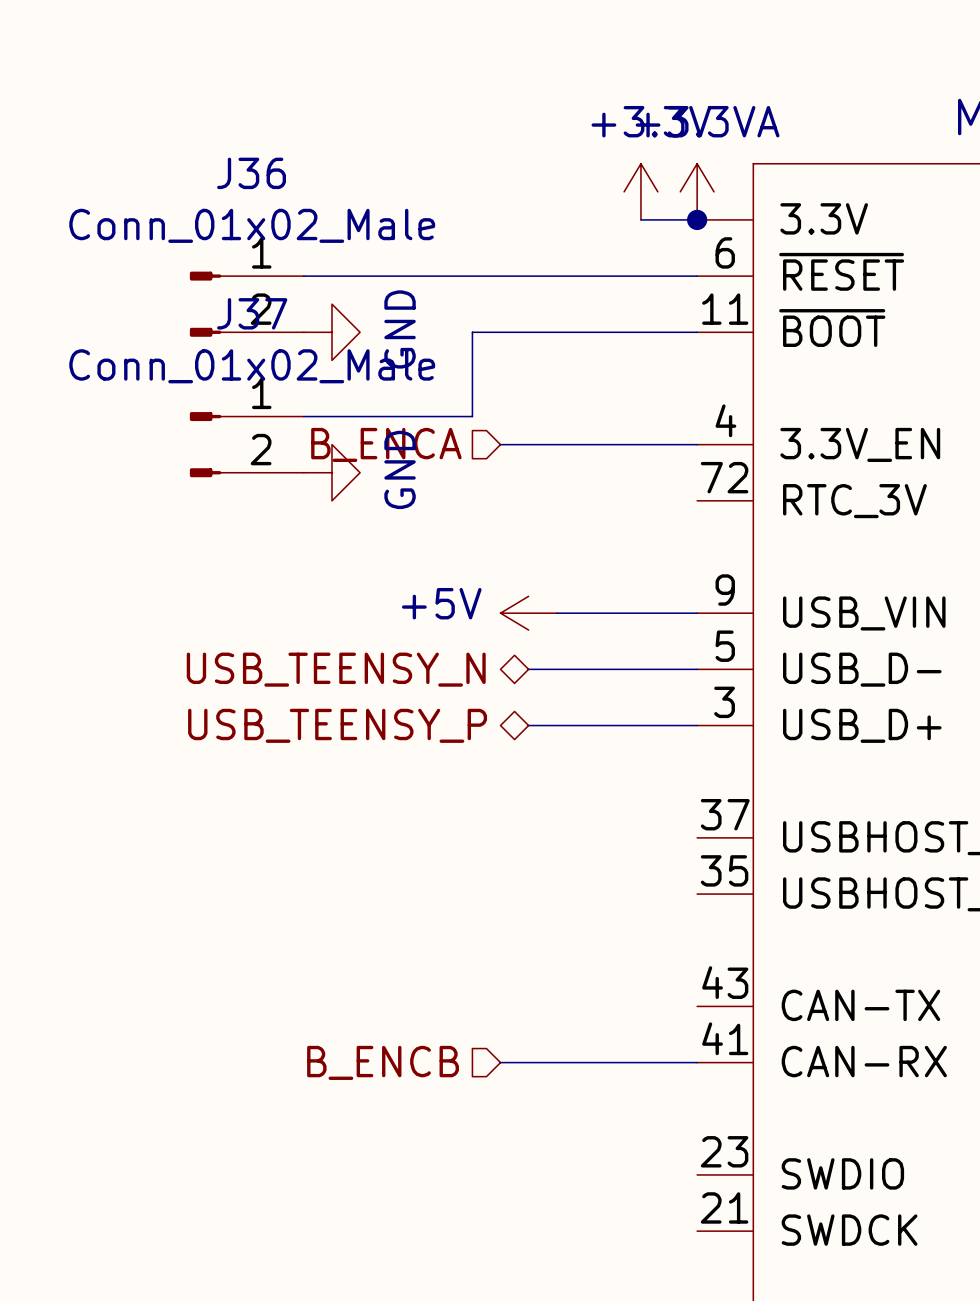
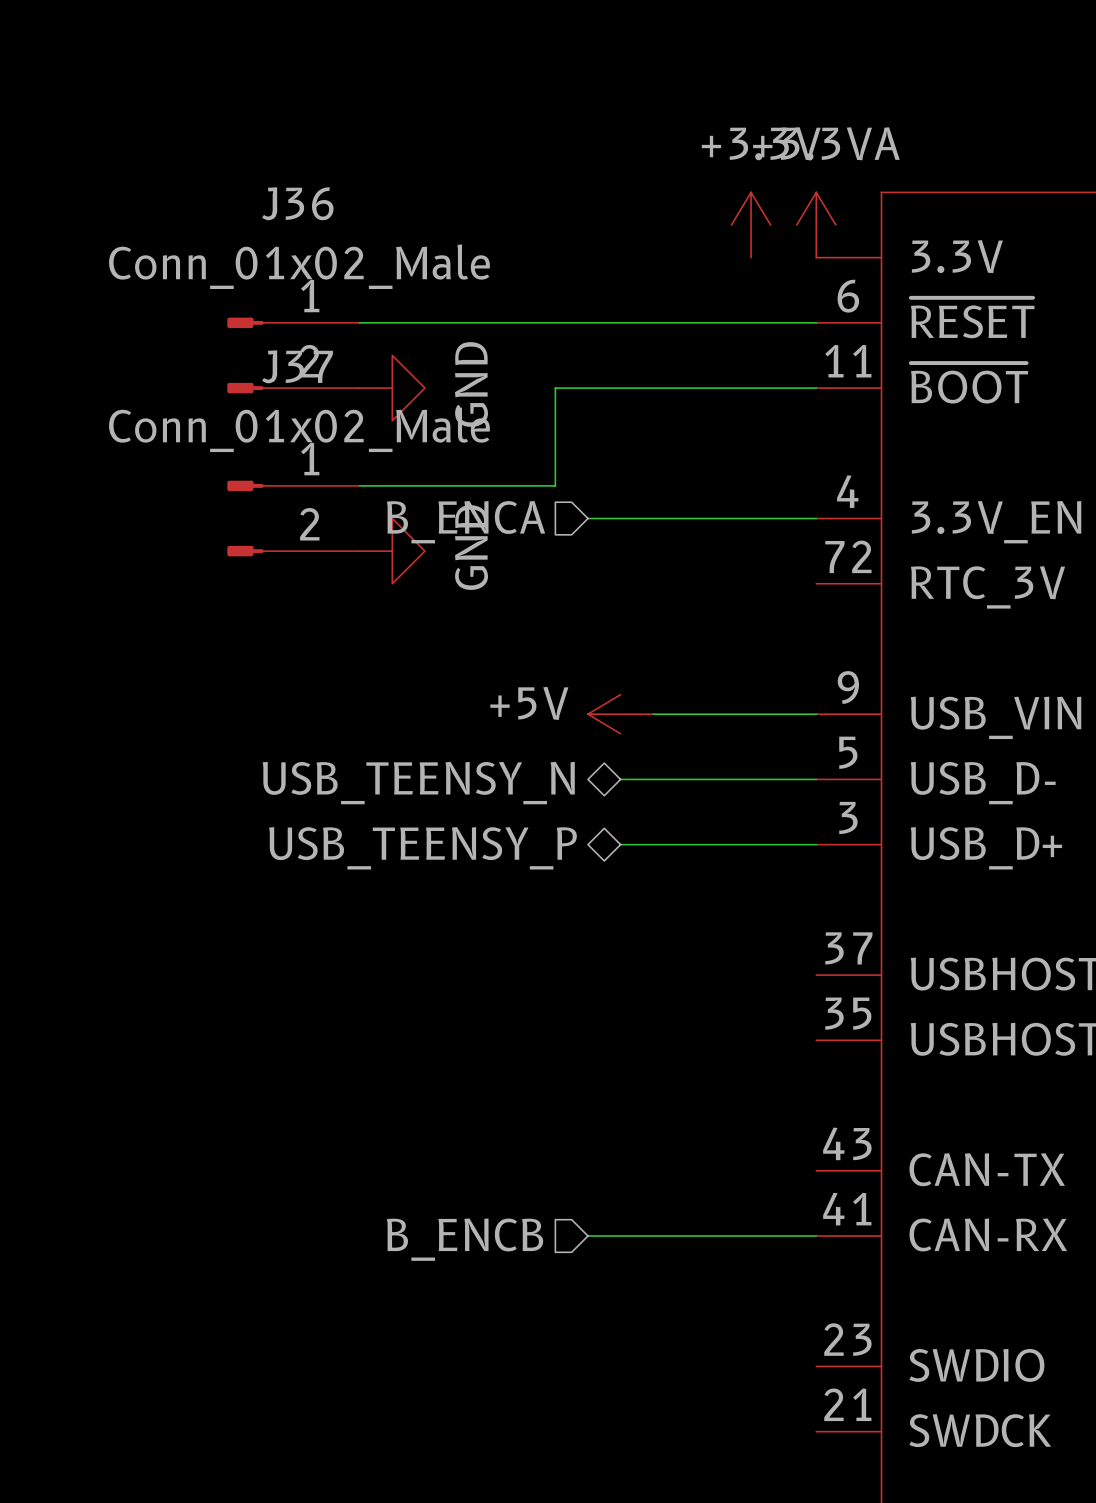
wire: (640, 219) (697, 219) -> none
junction: (697, 219) -> none

